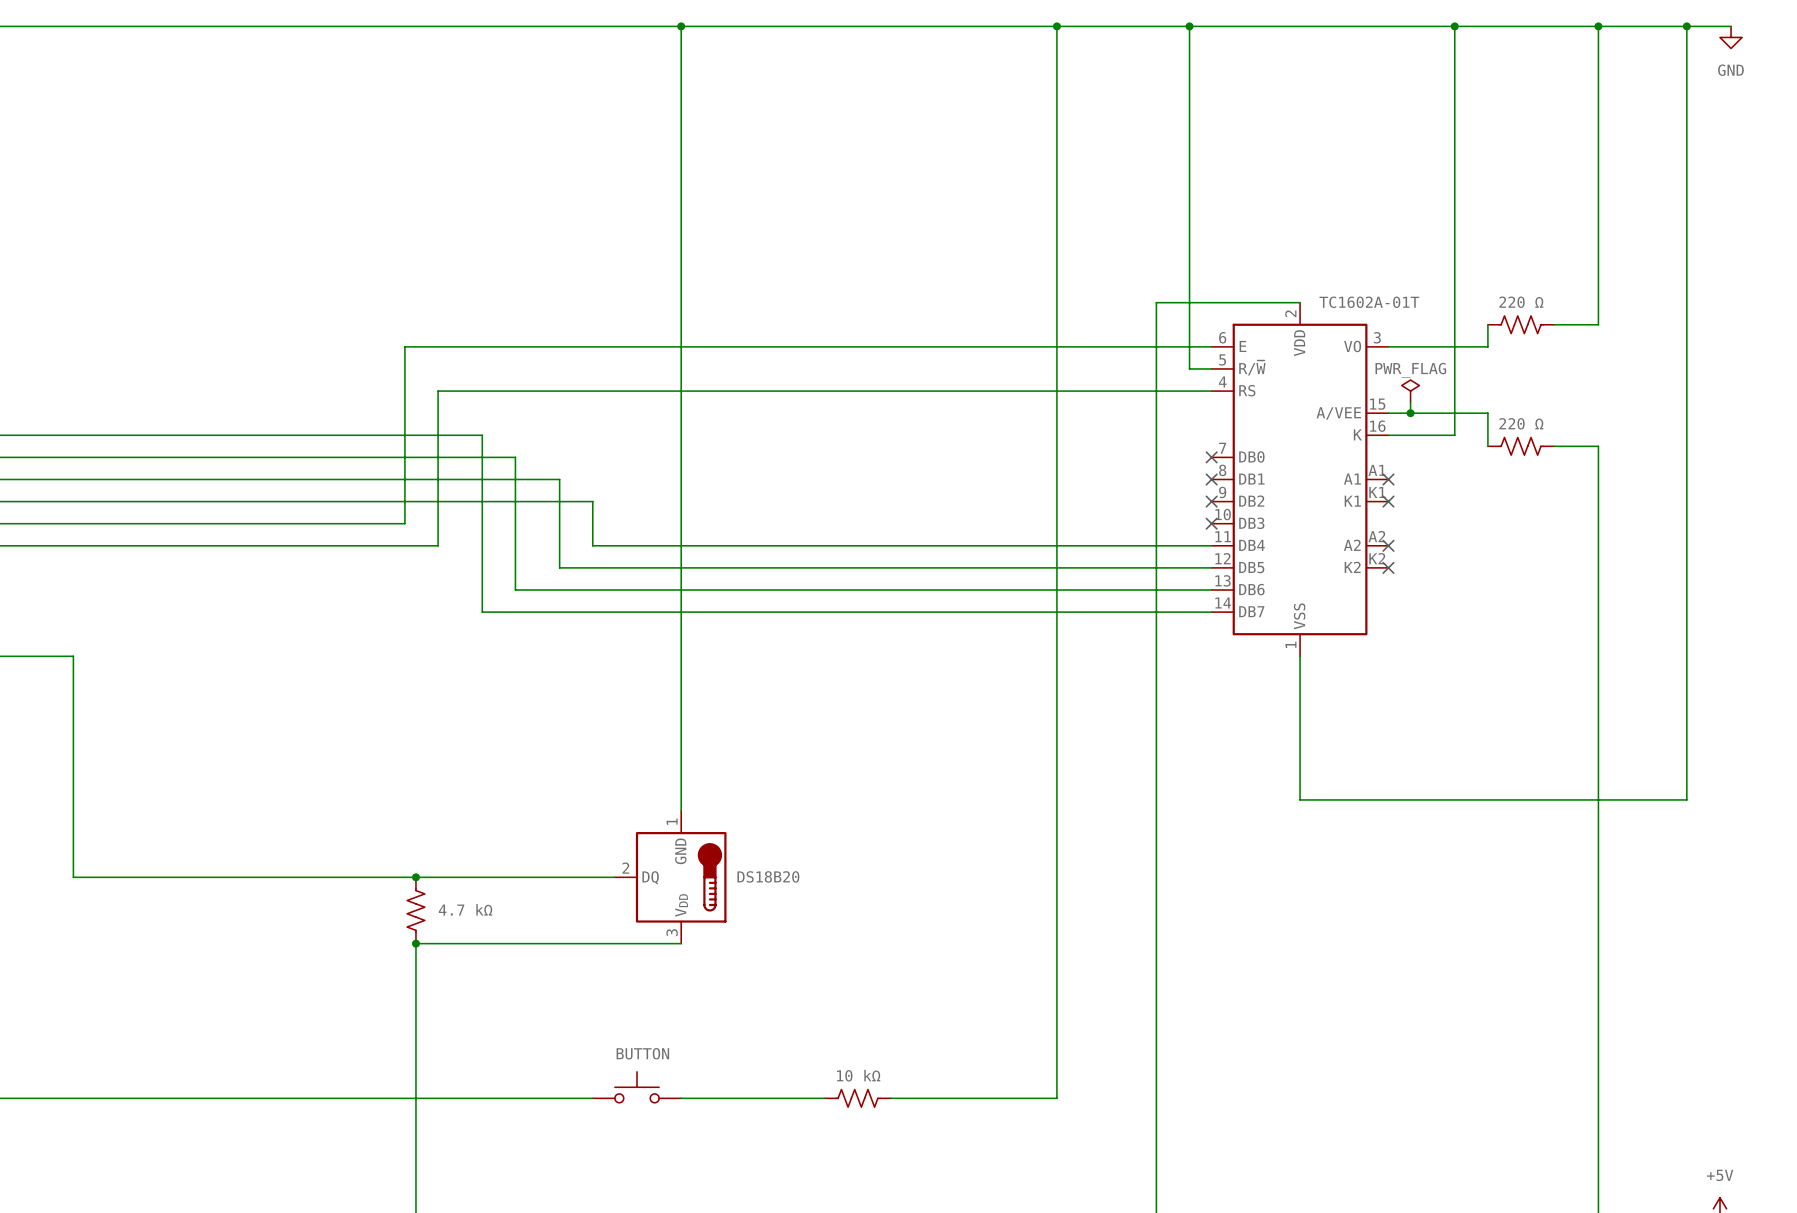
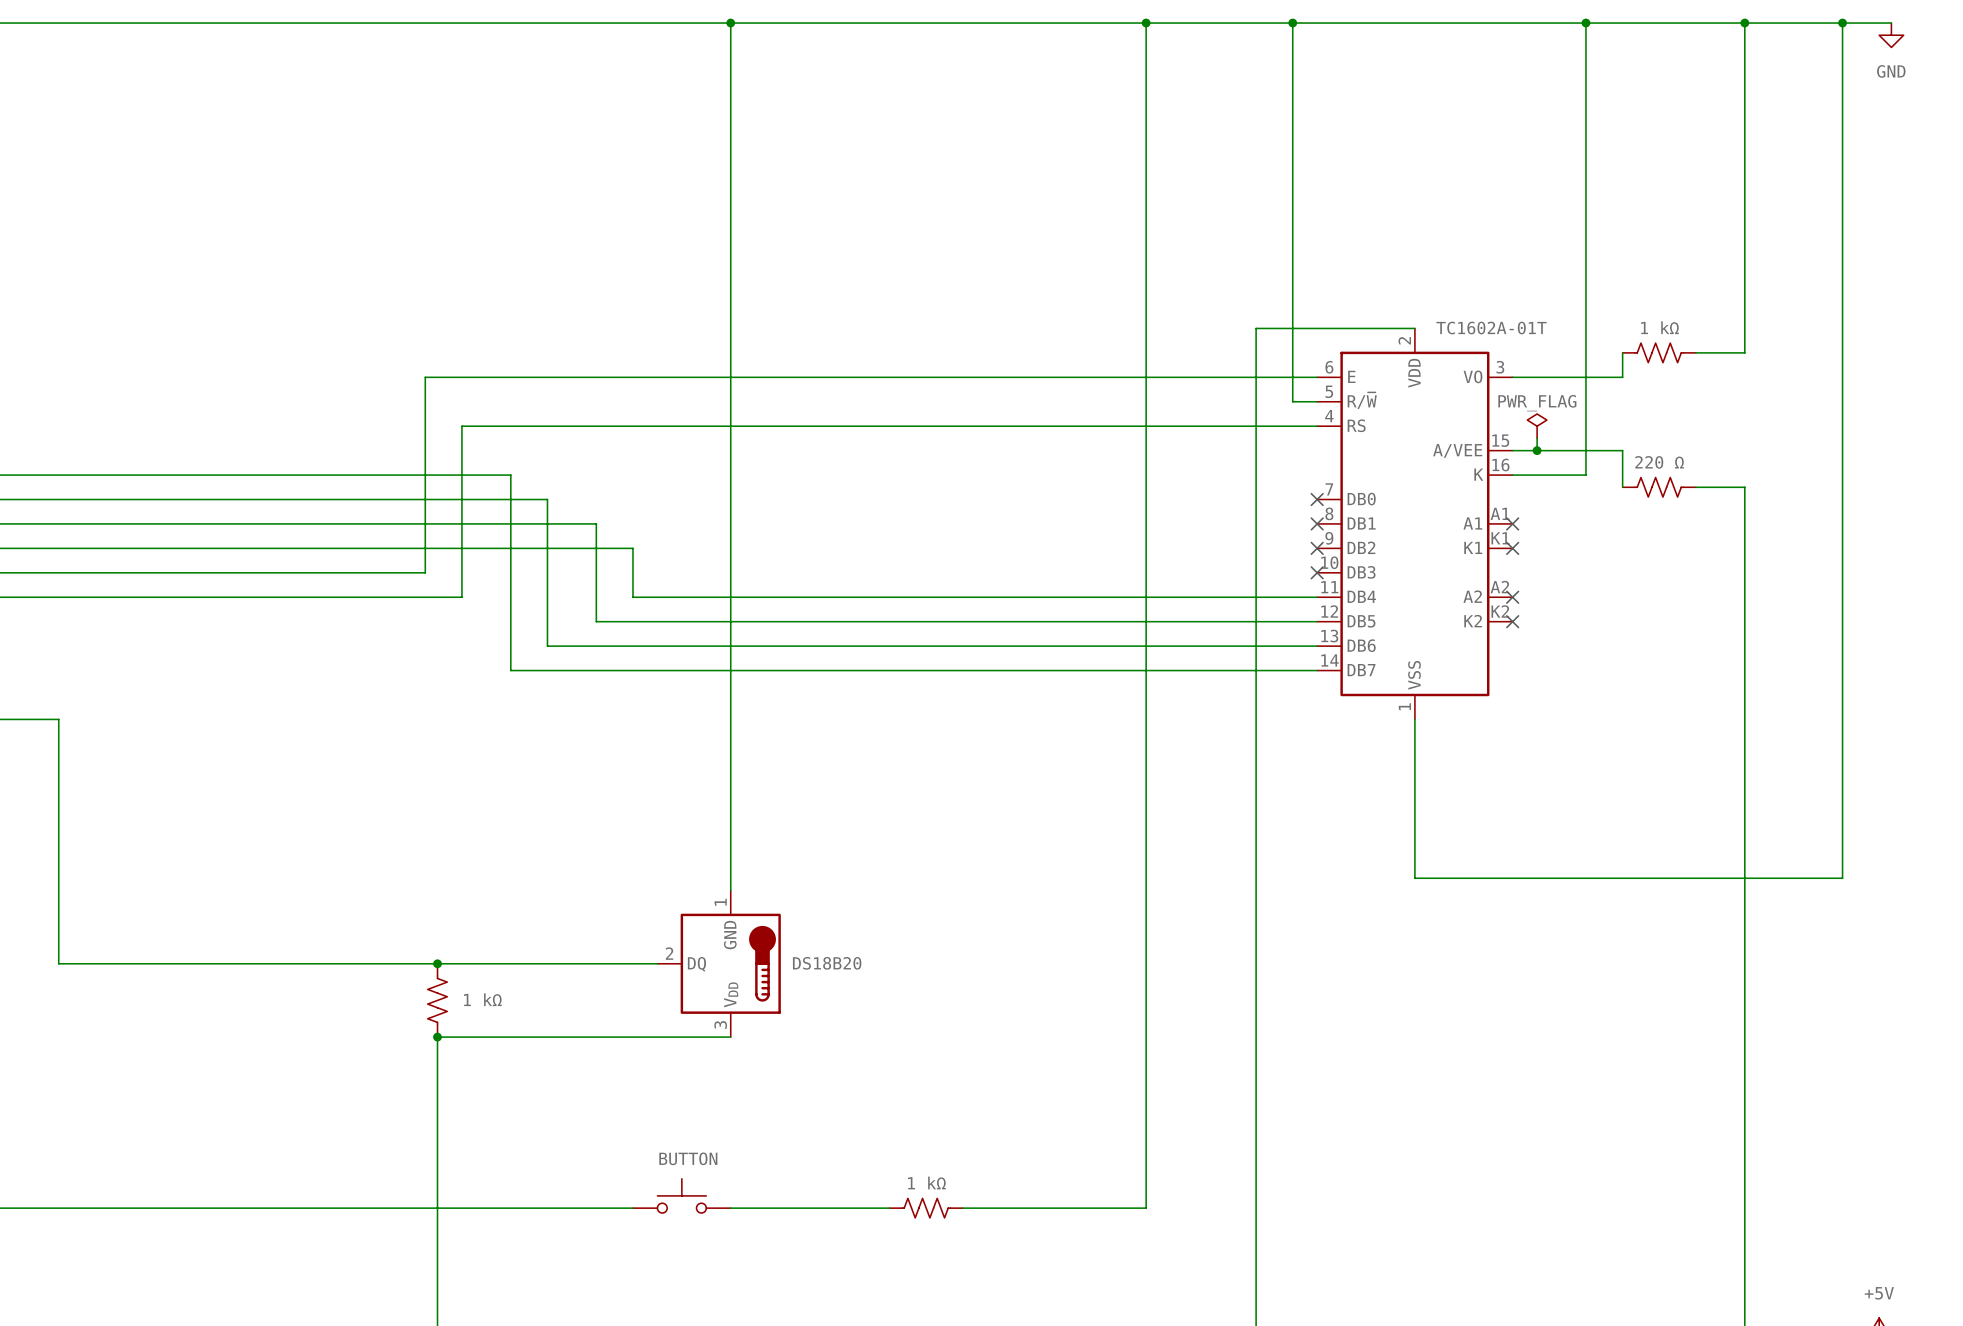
part value: 220 Ω (1521, 302) -> 1 kΩ (1659, 327)
part value: 4.7 kΩ (465, 909) -> 1 kΩ (482, 999)
part value: 10 kΩ (858, 1075) -> 1 kΩ (926, 1182)

